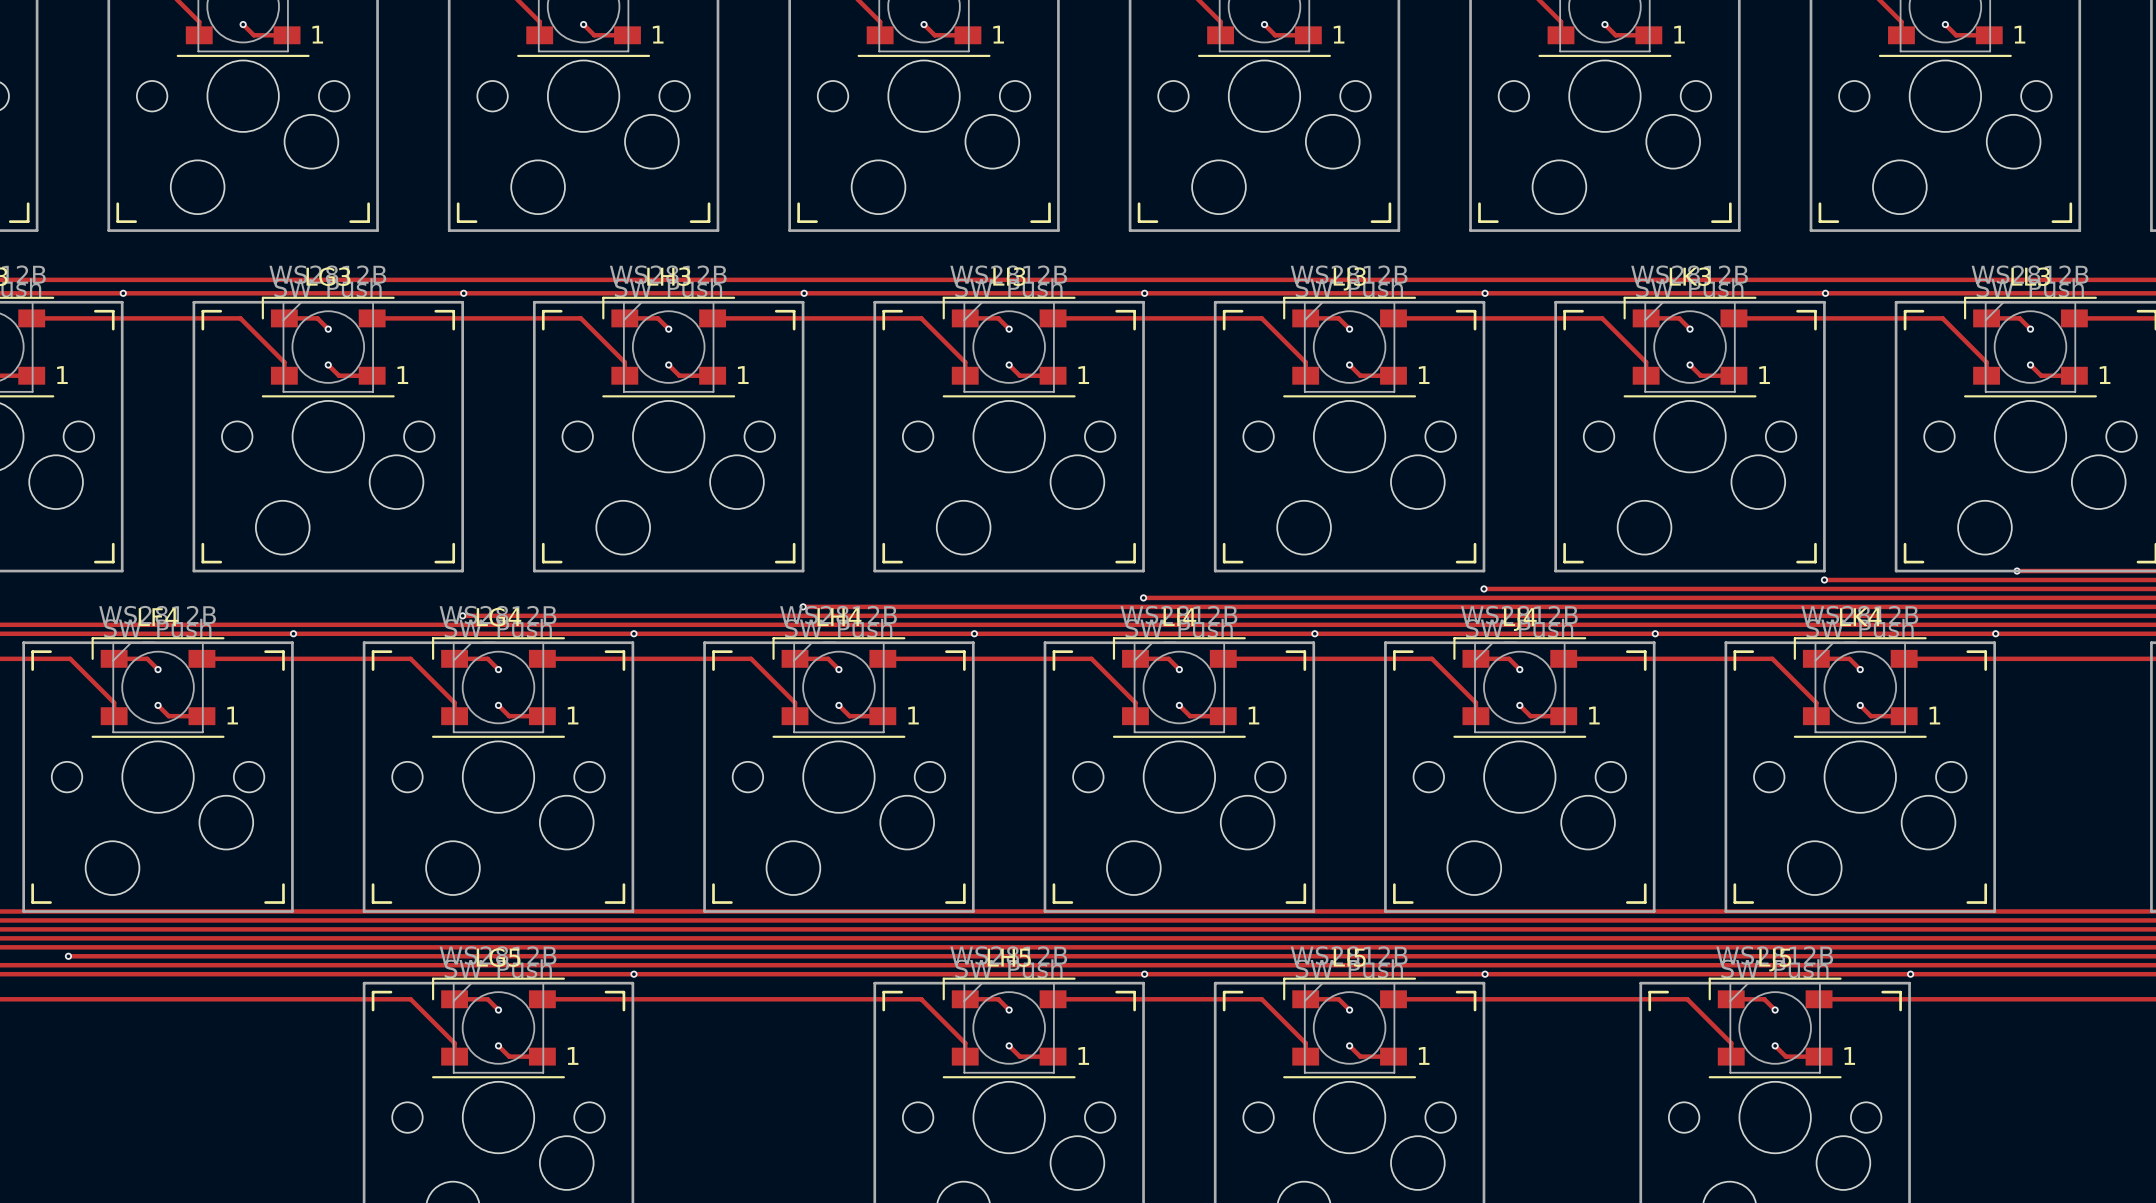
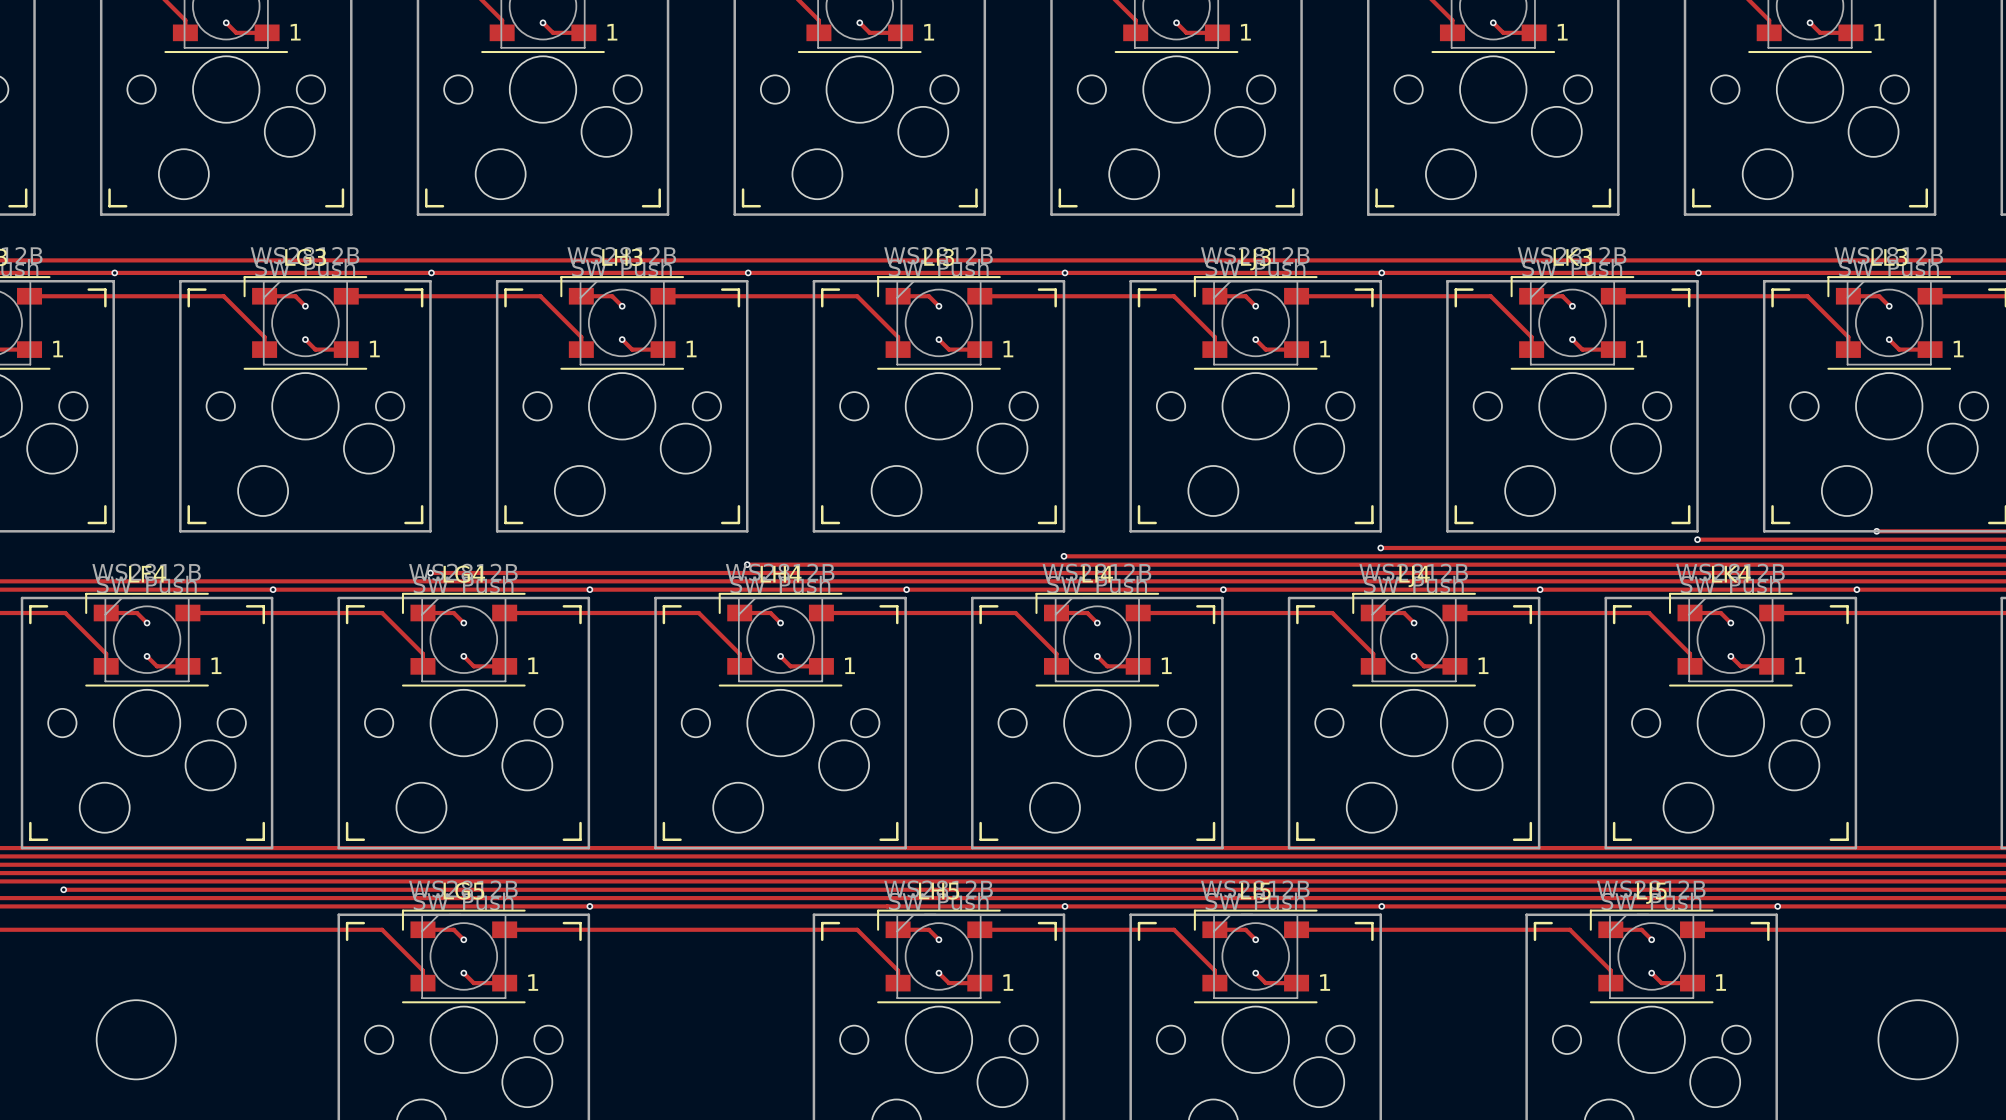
round board edge: none -> [96, 999, 177, 1080]
round board edge: none -> [1877, 999, 1959, 1080]

